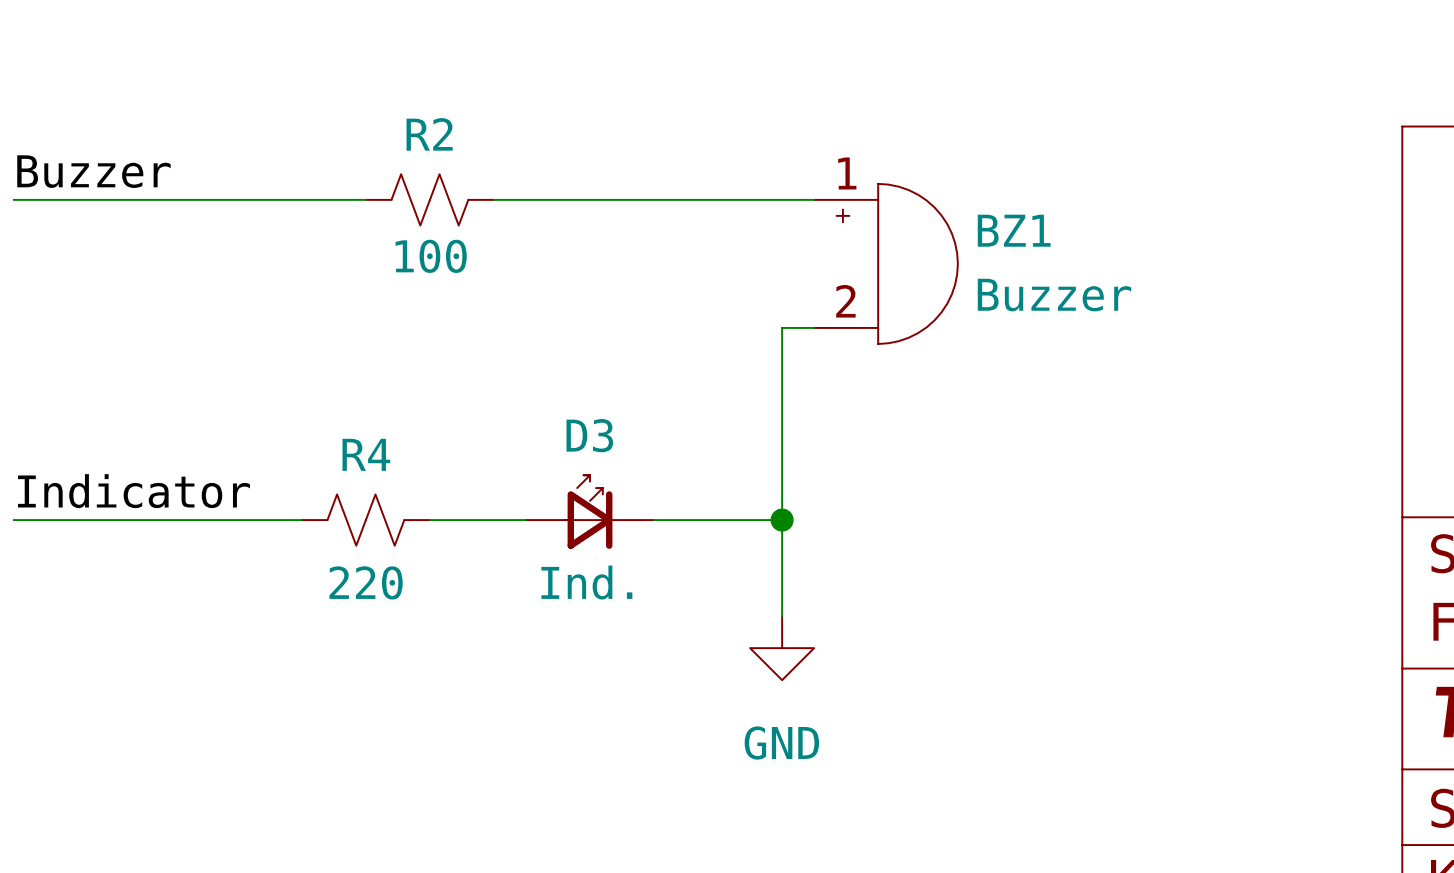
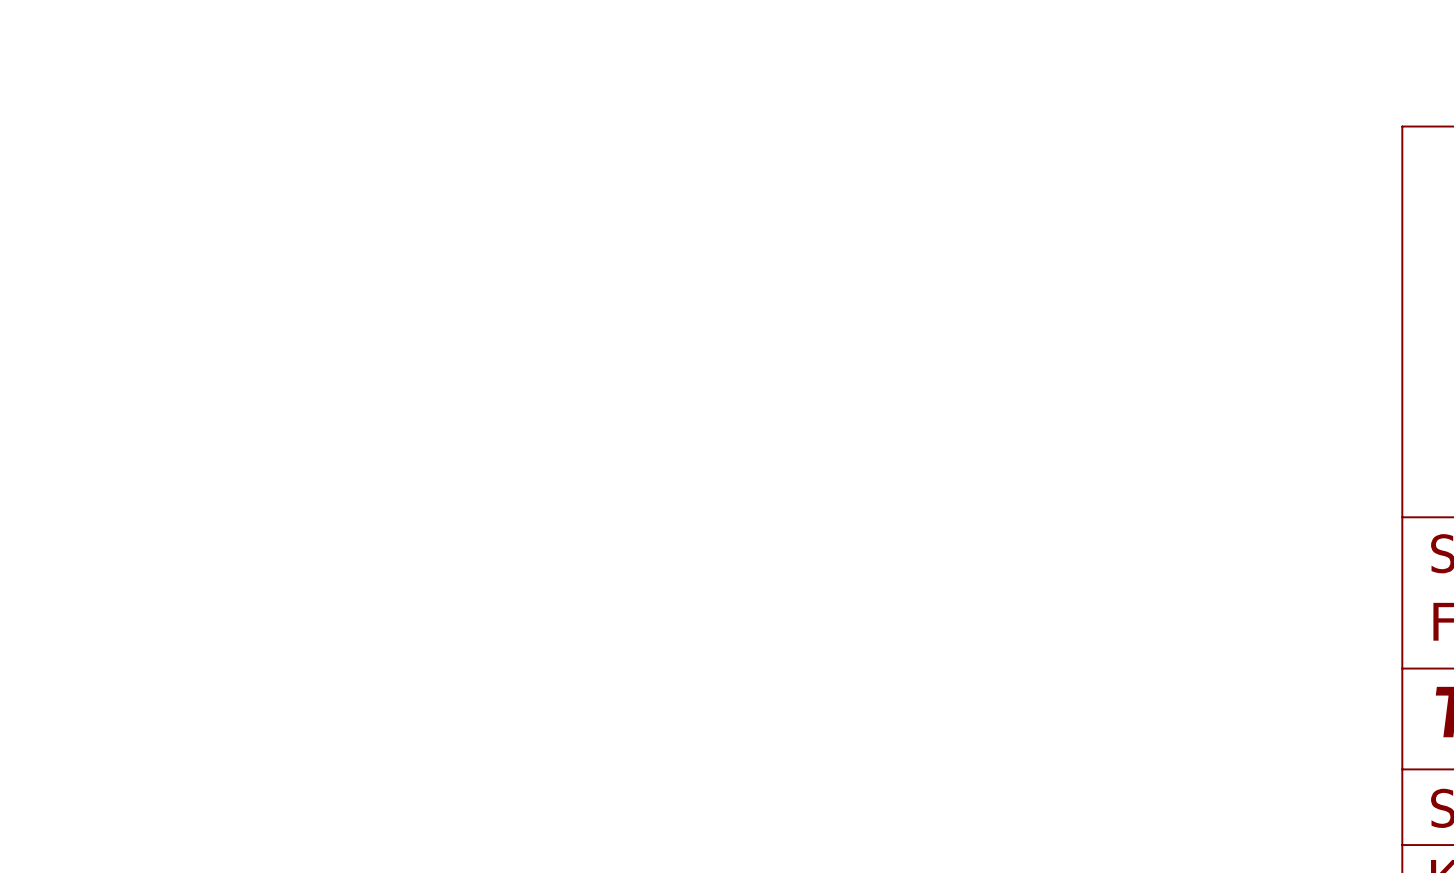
label: Buzzer (93, 171) -> none
wire: (13, 199) (365, 199) -> none
R2: 100 (429, 199) -> none
wire: (493, 199) (814, 199) -> none
BZ1: Buzzer (886, 263) -> none
wire: (814, 327) (782, 327) (782, 616) -> none
label: Indicator (133, 491) -> none
D3: Ind. (590, 512) -> none
wire: (13, 520) (301, 520) -> none
R4: 220 (365, 520) -> none
wire: (429, 520) (525, 520) -> none
wire: (654, 520) (782, 520) -> none
junction: (782, 520) -> none
power symbol: GND (782, 648) -> none

